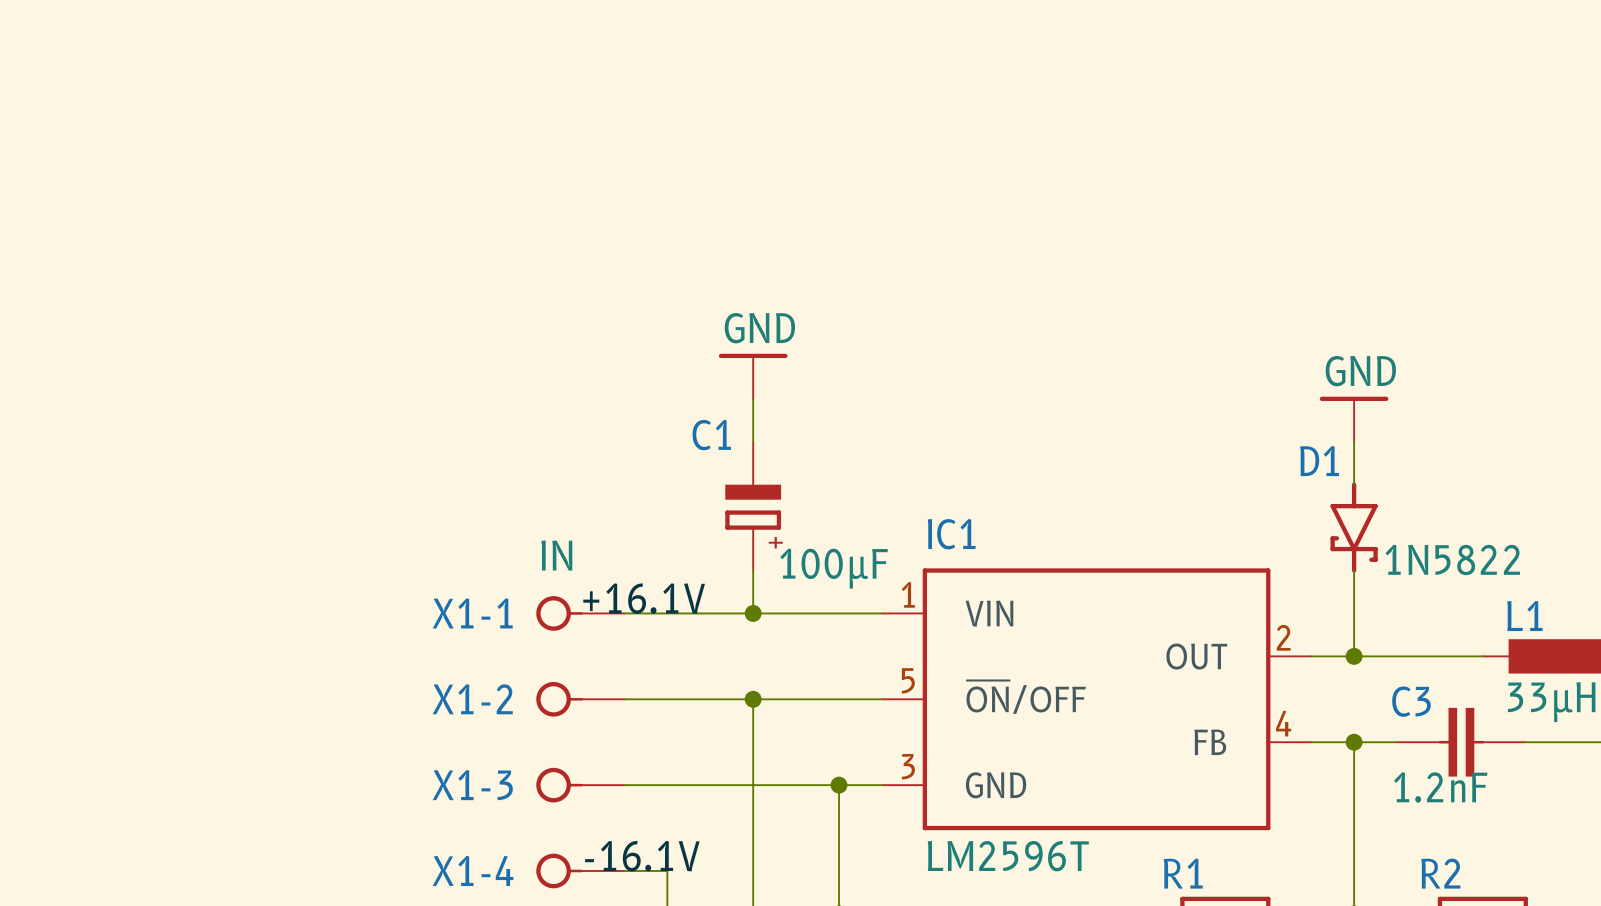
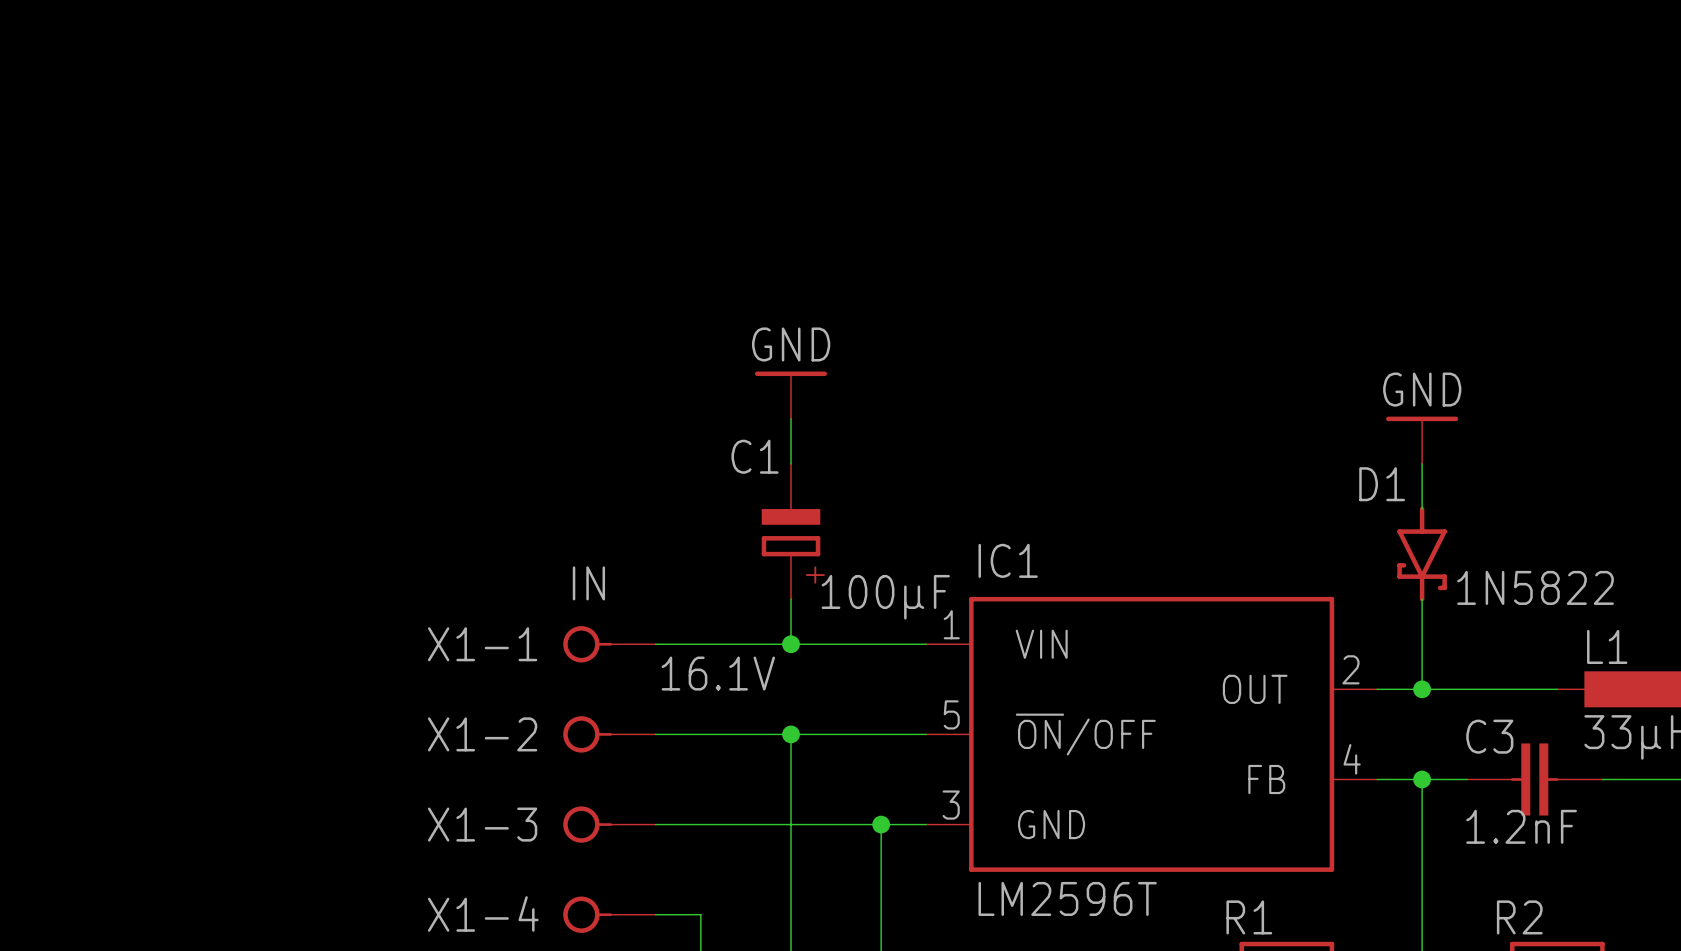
label: +16.1V (644, 598) -> 16.1V (718, 673)
label: -16.1V (642, 856) -> none

